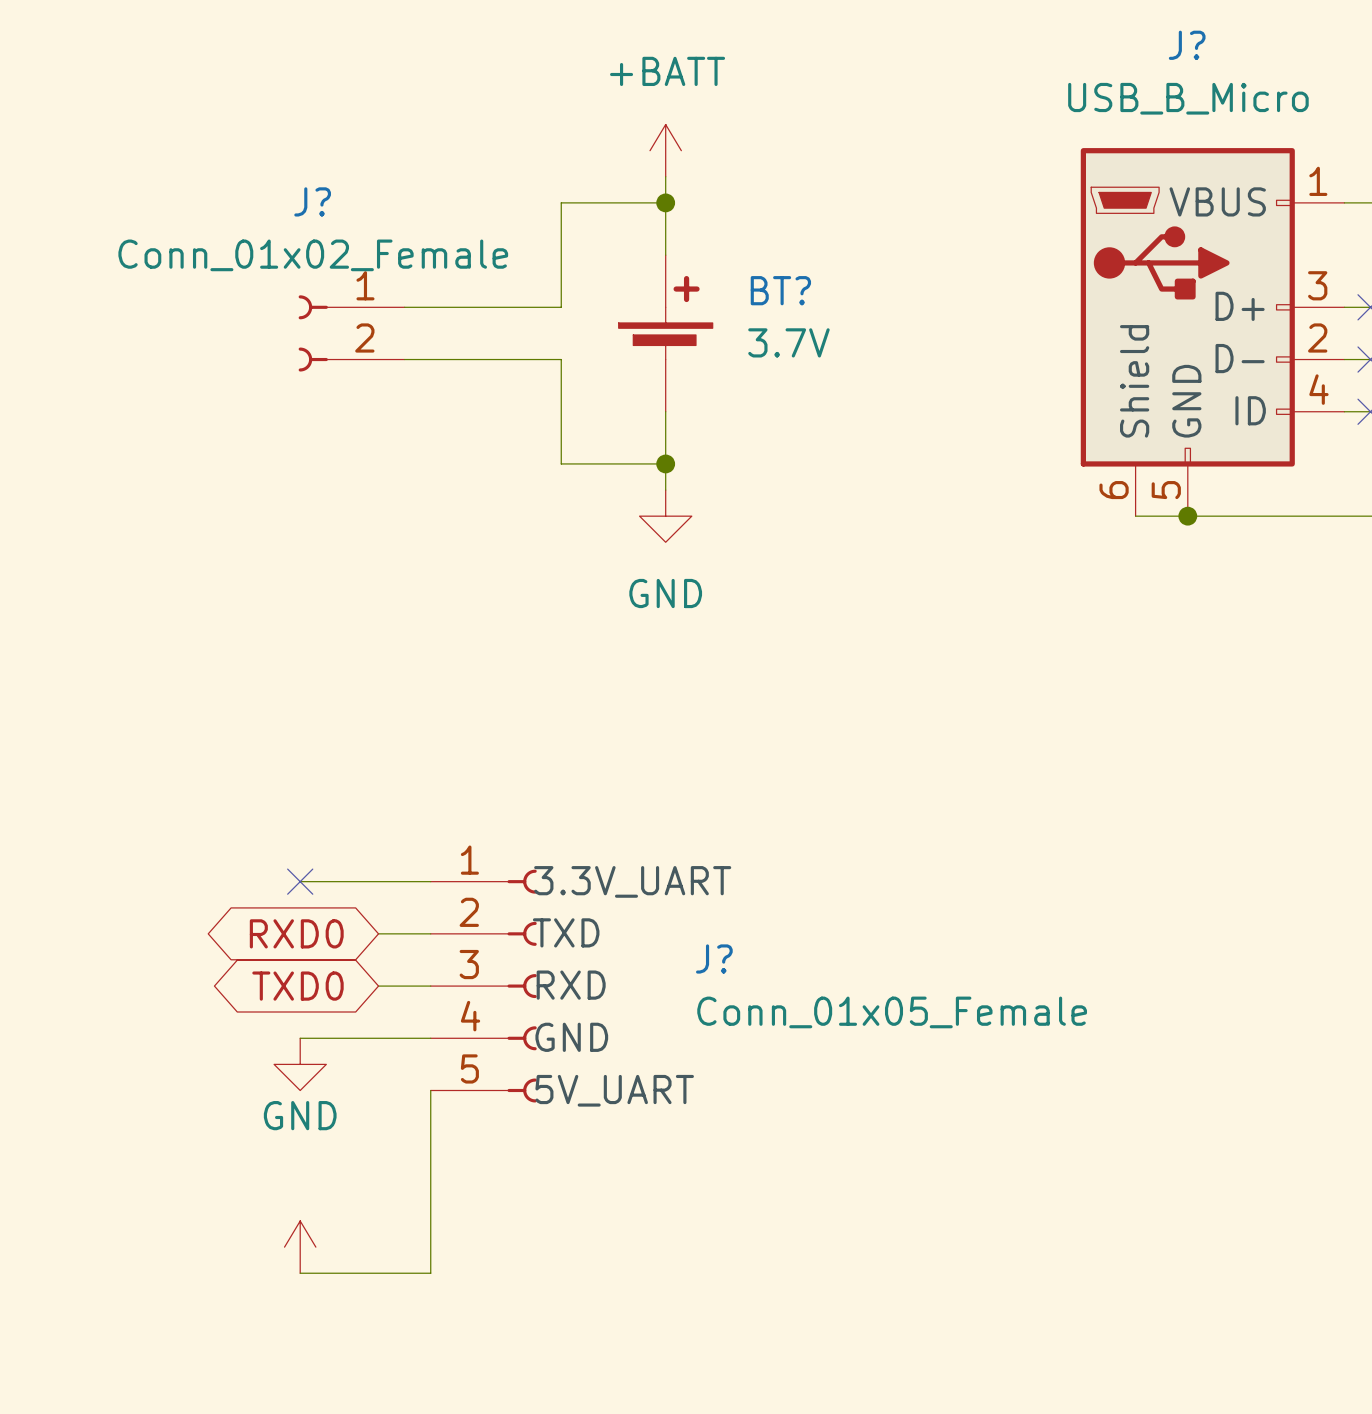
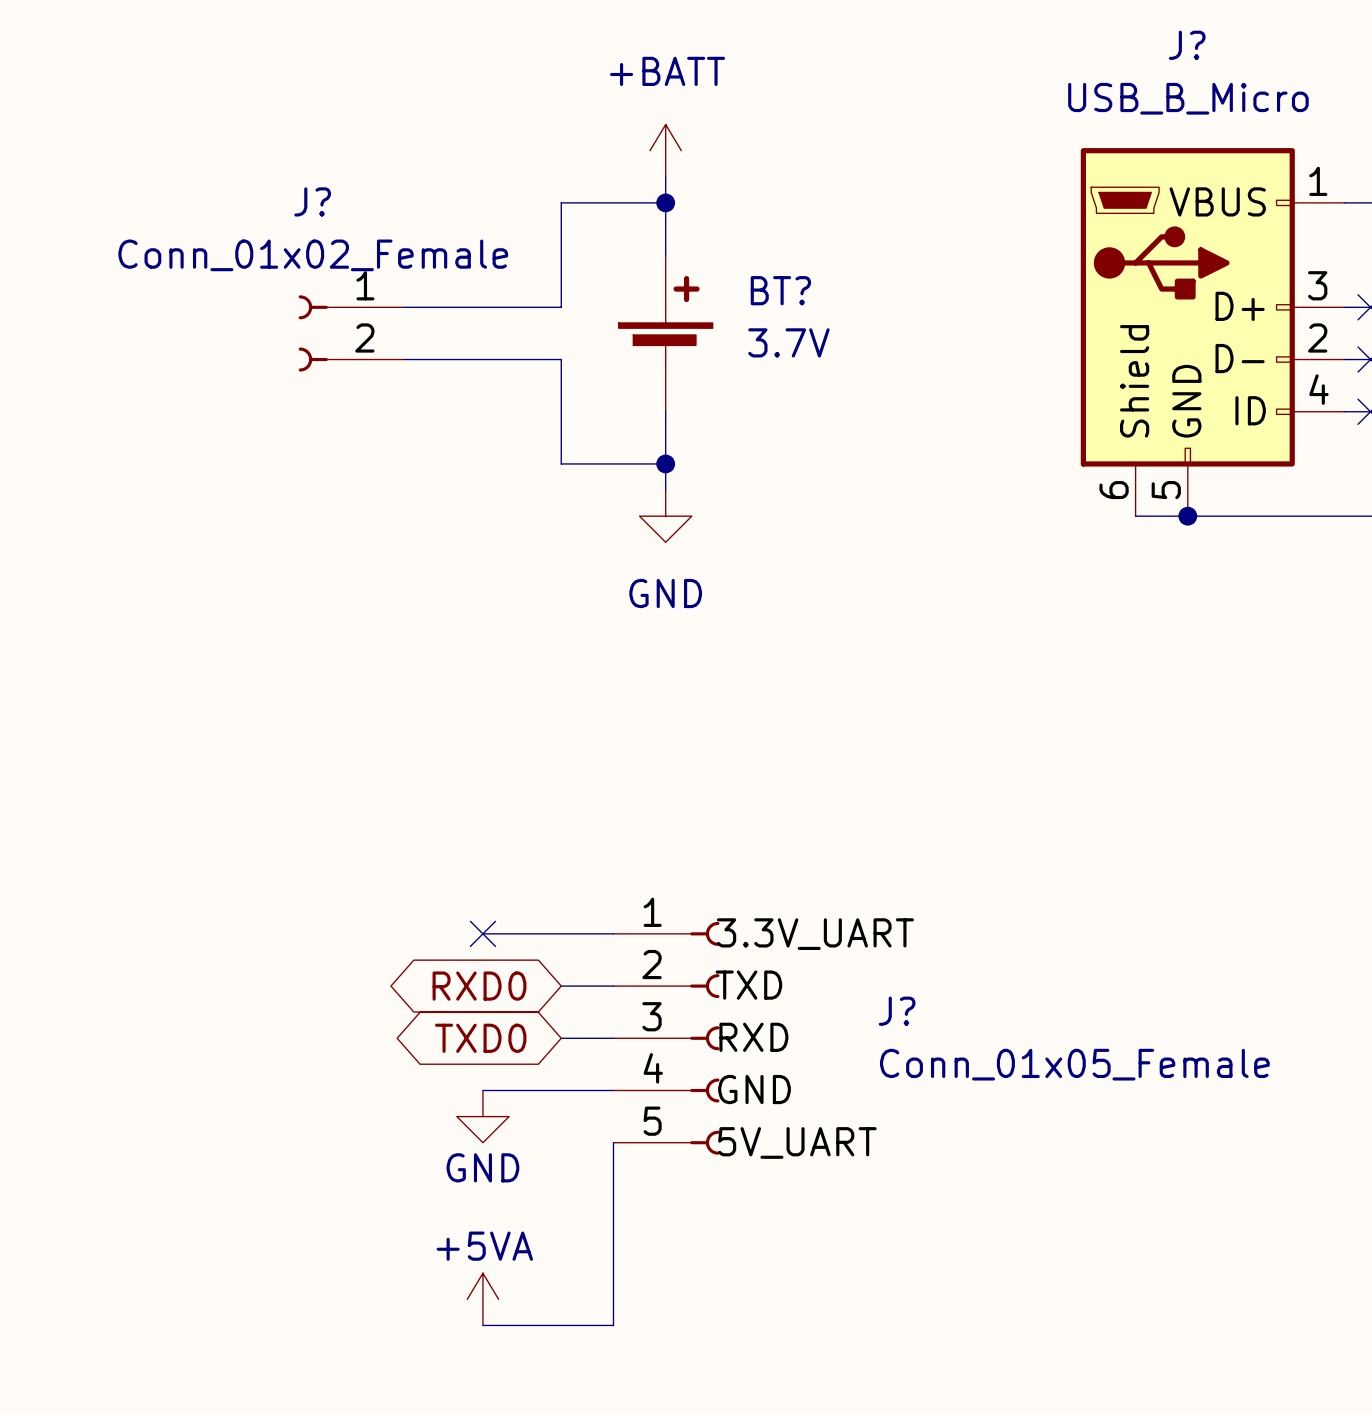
wire: (300, 881) (430, 881) -> (482, 933) (613, 933)
no-connect mark: (300, 881) -> none
global label position: RXD0 (296, 933) -> RXD0 (479, 986)
wire: (378, 933) (430, 933) -> (561, 986) (613, 986)
no-connect mark: none -> (482, 933)
global label position: TXD0 (297, 986) -> TXD0 (480, 1038)
wire: (378, 986) (430, 986) -> (561, 1038) (613, 1038)
J? position: (483, 986) -> (666, 1038)
wire: (300, 1038) (430, 1038) -> (482, 1090) (613, 1090)
power symbol position: GND (300, 1064) -> GND (482, 1116)
wire: (430, 1090) (430, 1273) (300, 1273) -> (613, 1142) (613, 1325) (482, 1325)
power symbol: (300, 1247) -> none
power symbol: none -> +5VA (482, 1299)

